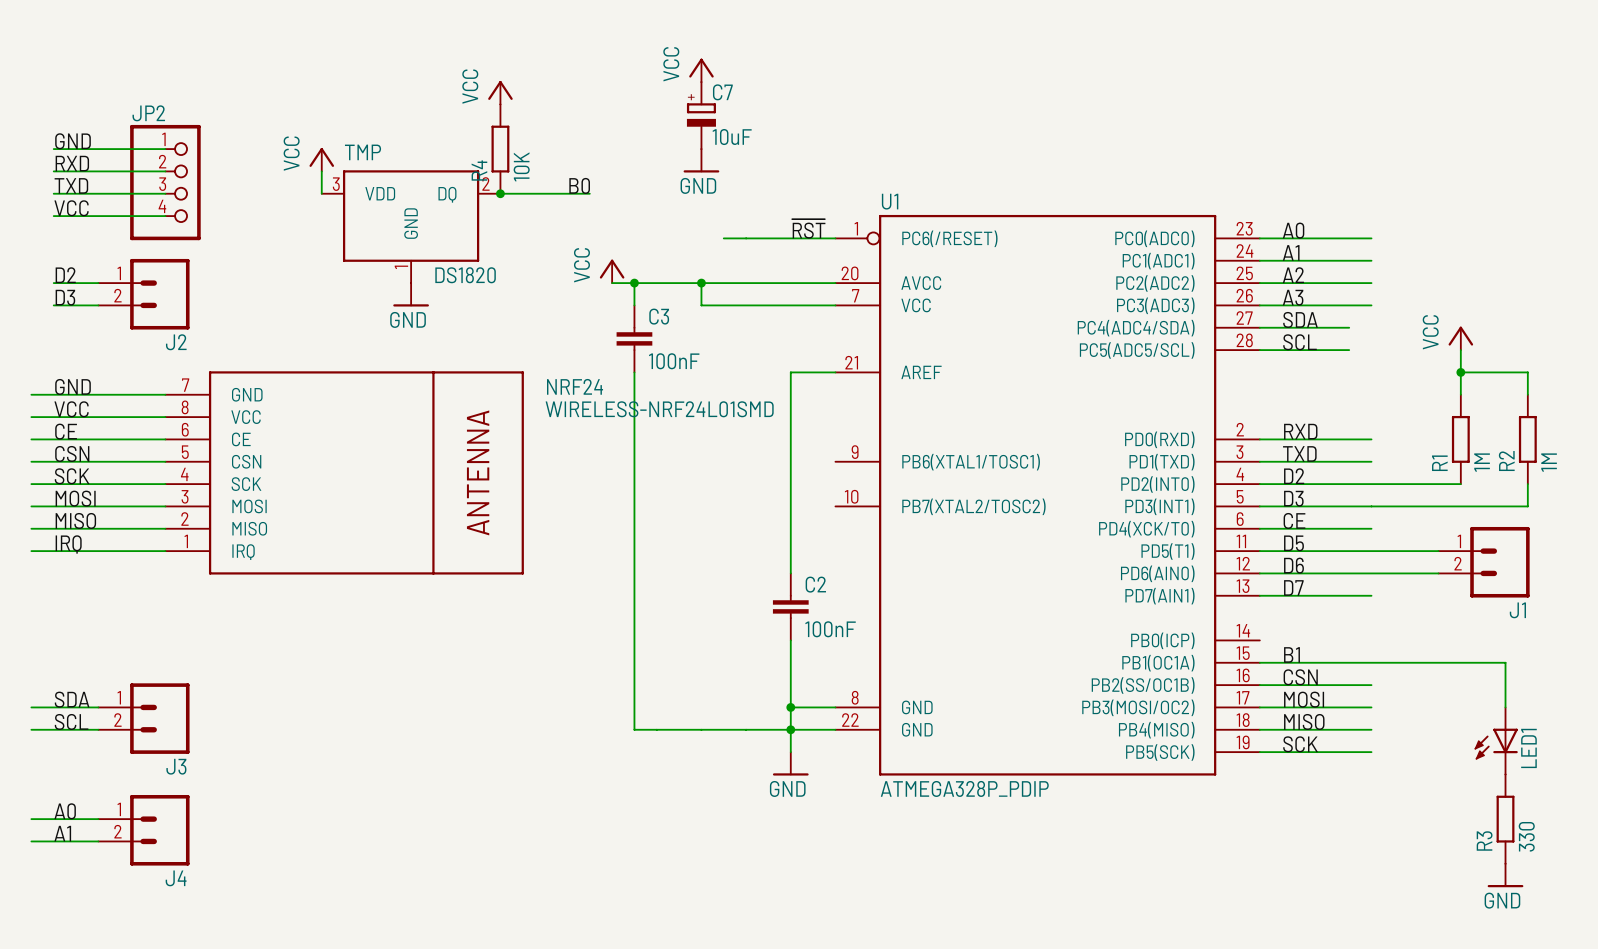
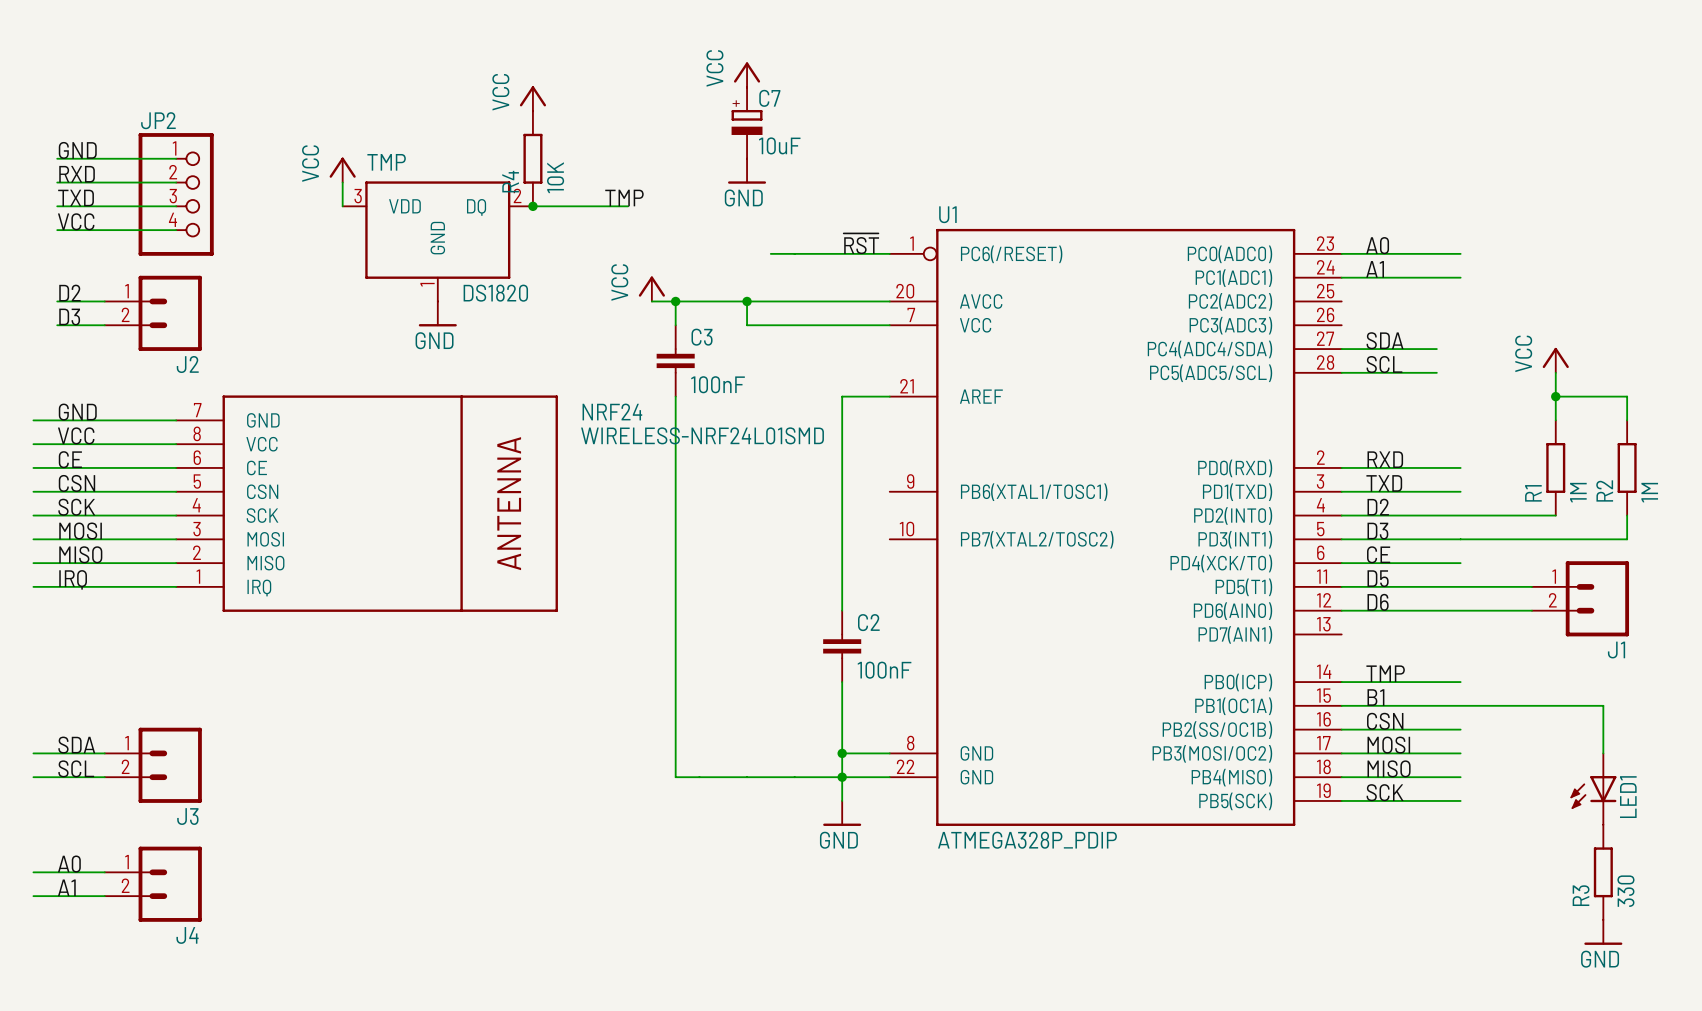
label: B0 (579, 185) -> TMP (624, 197)
label: A2 (1293, 275) -> none
wire: (1259, 283) (1371, 283) -> none
label: A3 (1293, 297) -> none
wire: (1259, 305) (1371, 305) -> none
label: D7 (1293, 587) -> none
wire: (1259, 595) (1371, 595) -> (1341, 682) (1460, 682)
label: none -> TMP (1385, 673)

